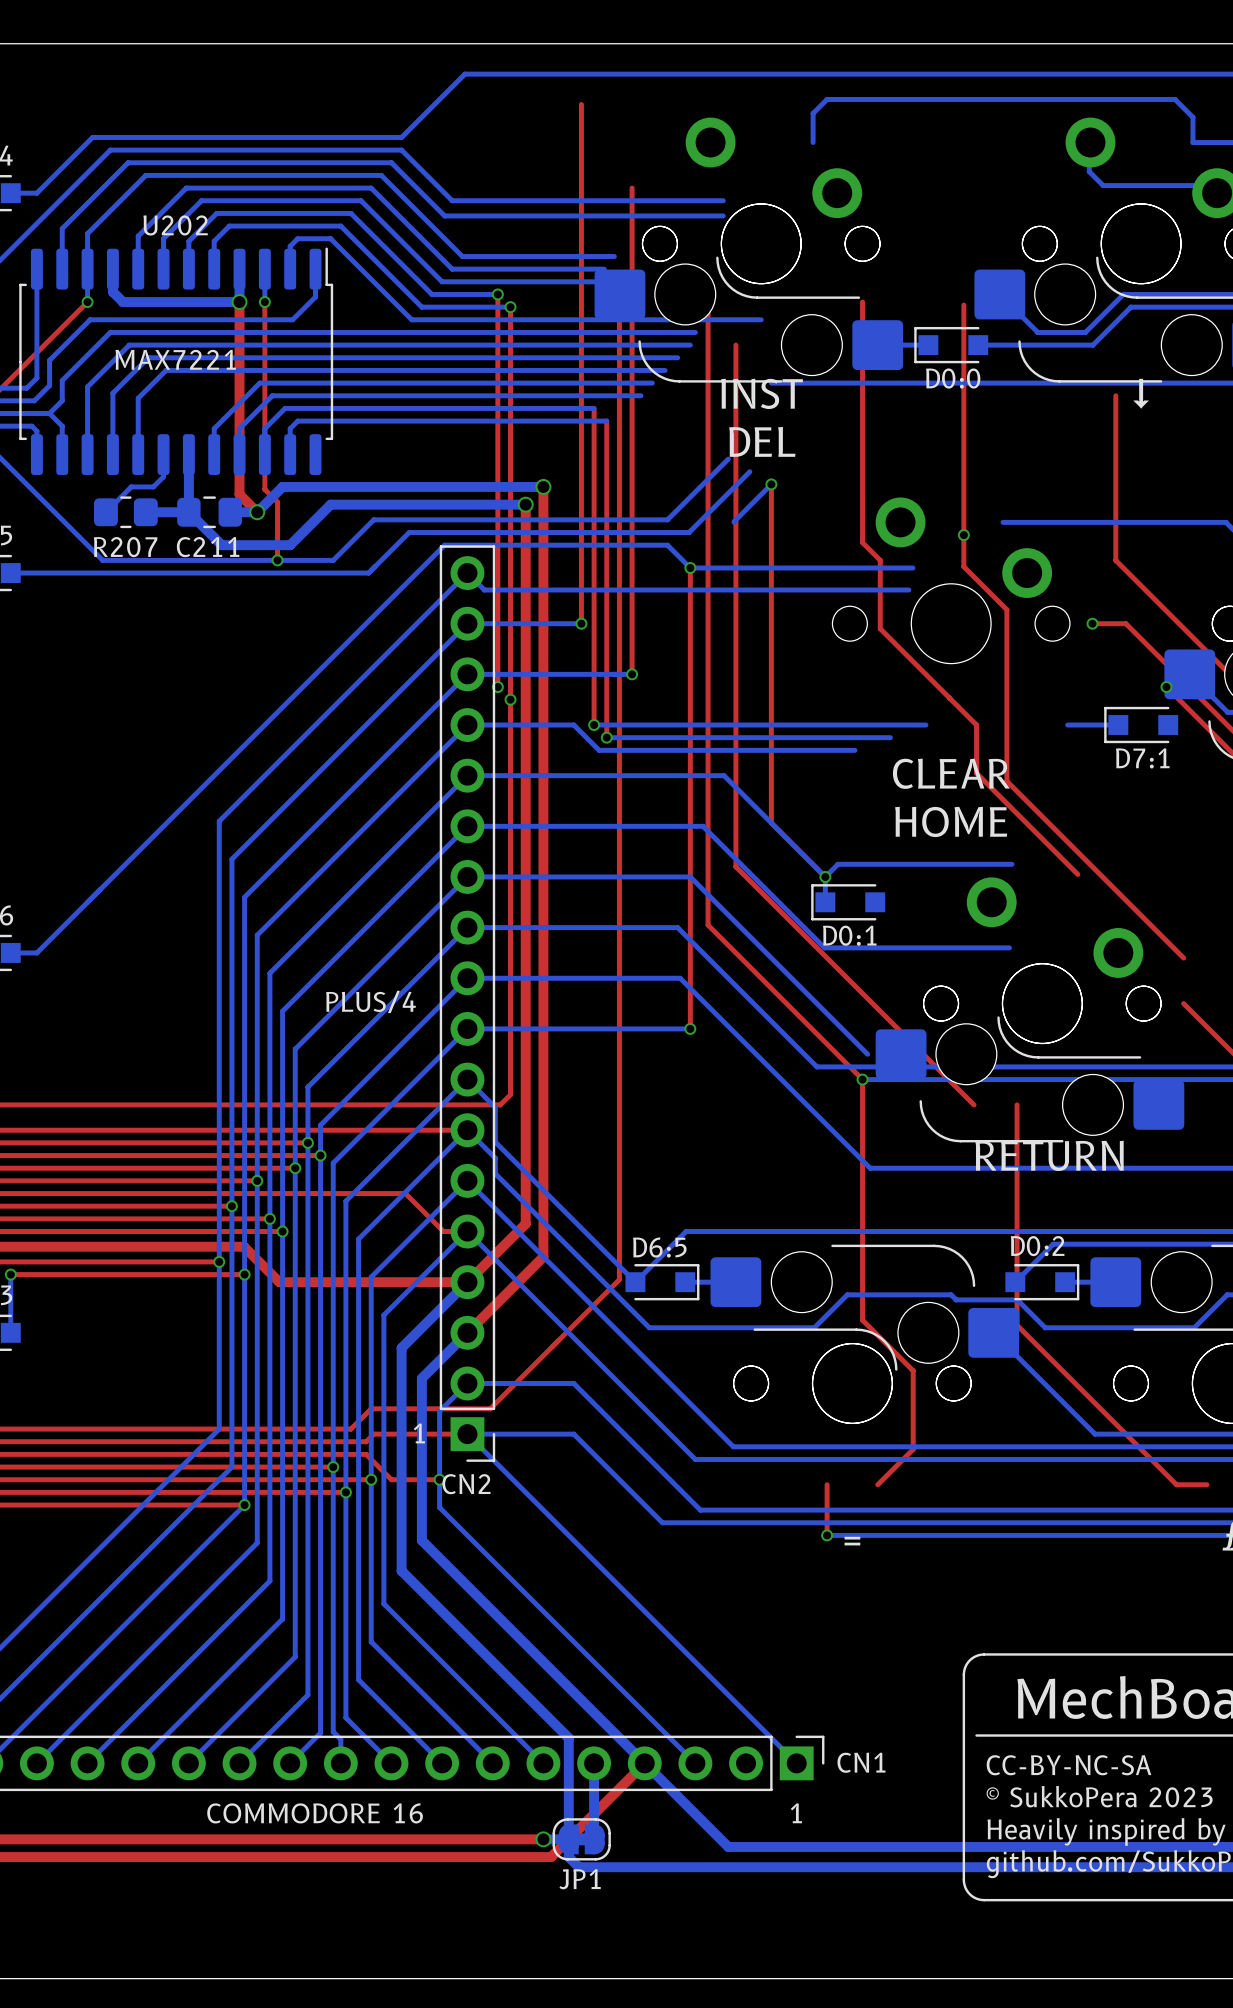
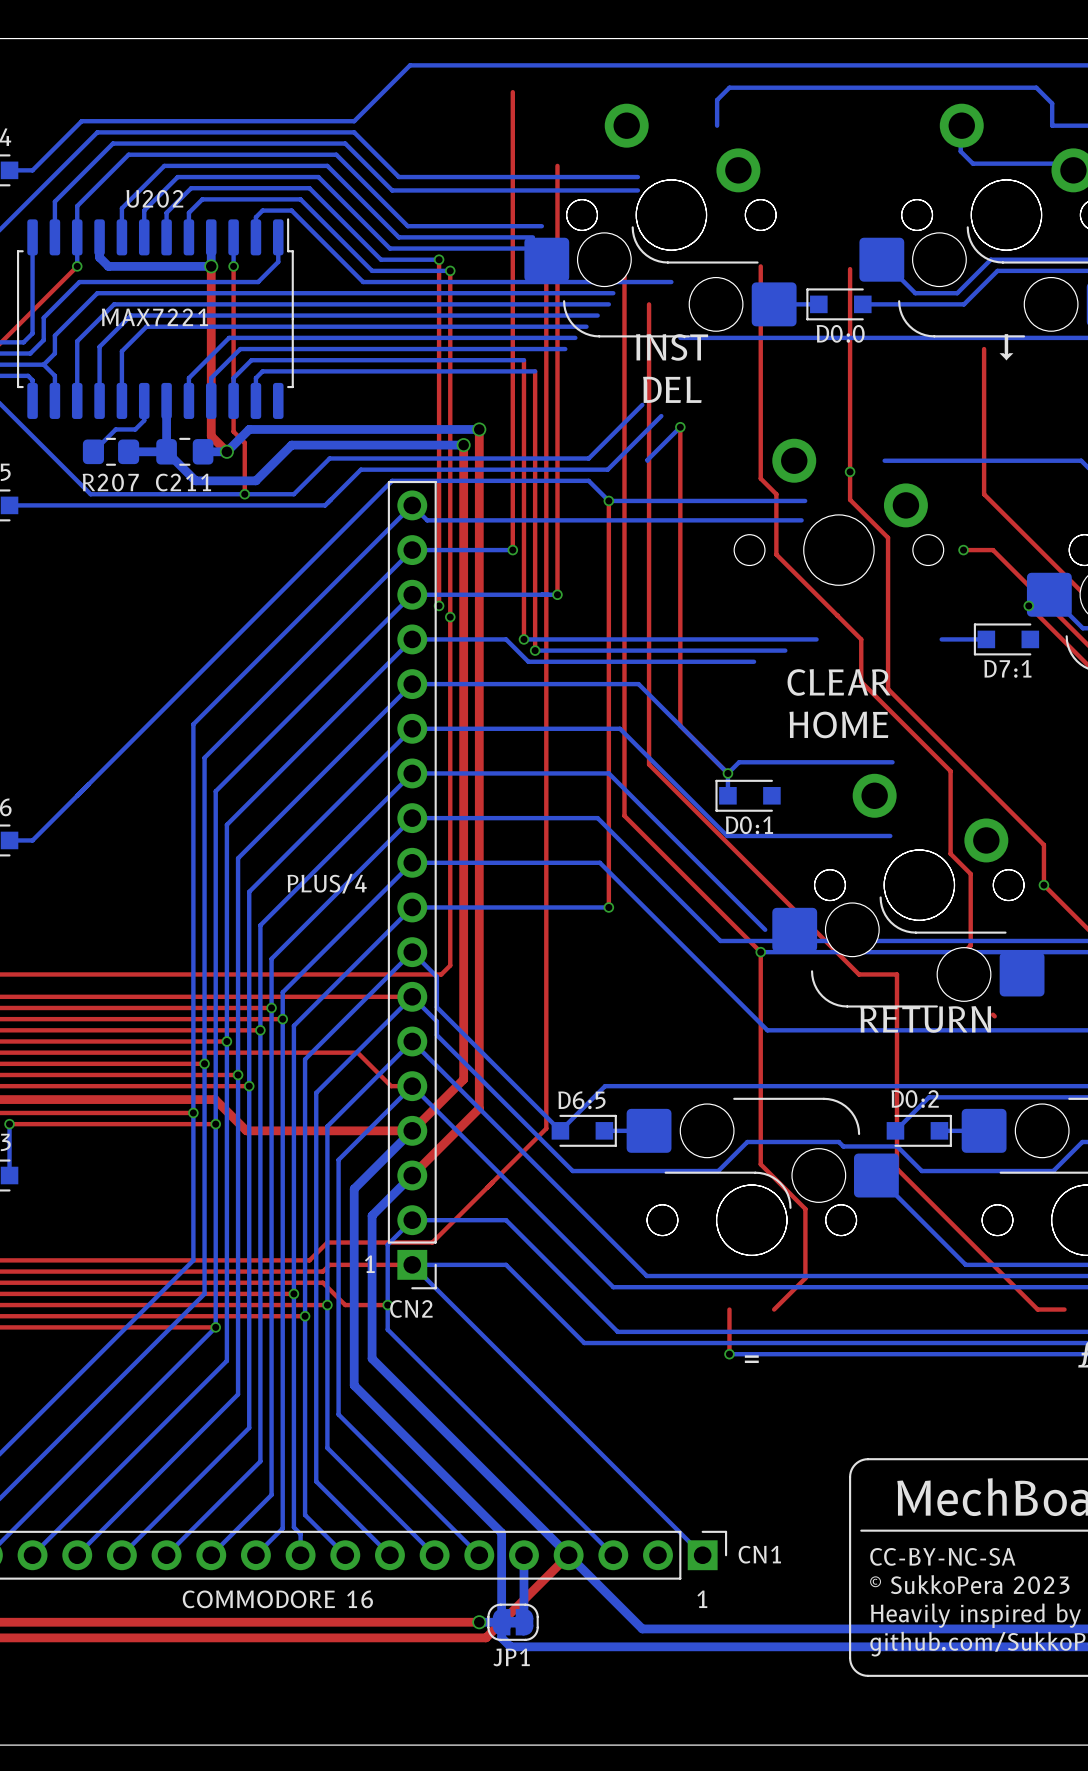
top track: none -> (950, 771) (950, 853) (970, 873) (970, 945) (941, 974)
top track: none -> (1043, 844) (1043, 885)
via: none -> (1043, 885)
top track: none -> (896, 974) (859, 974)
top track: none -> (993, 1014) (994, 1016)

